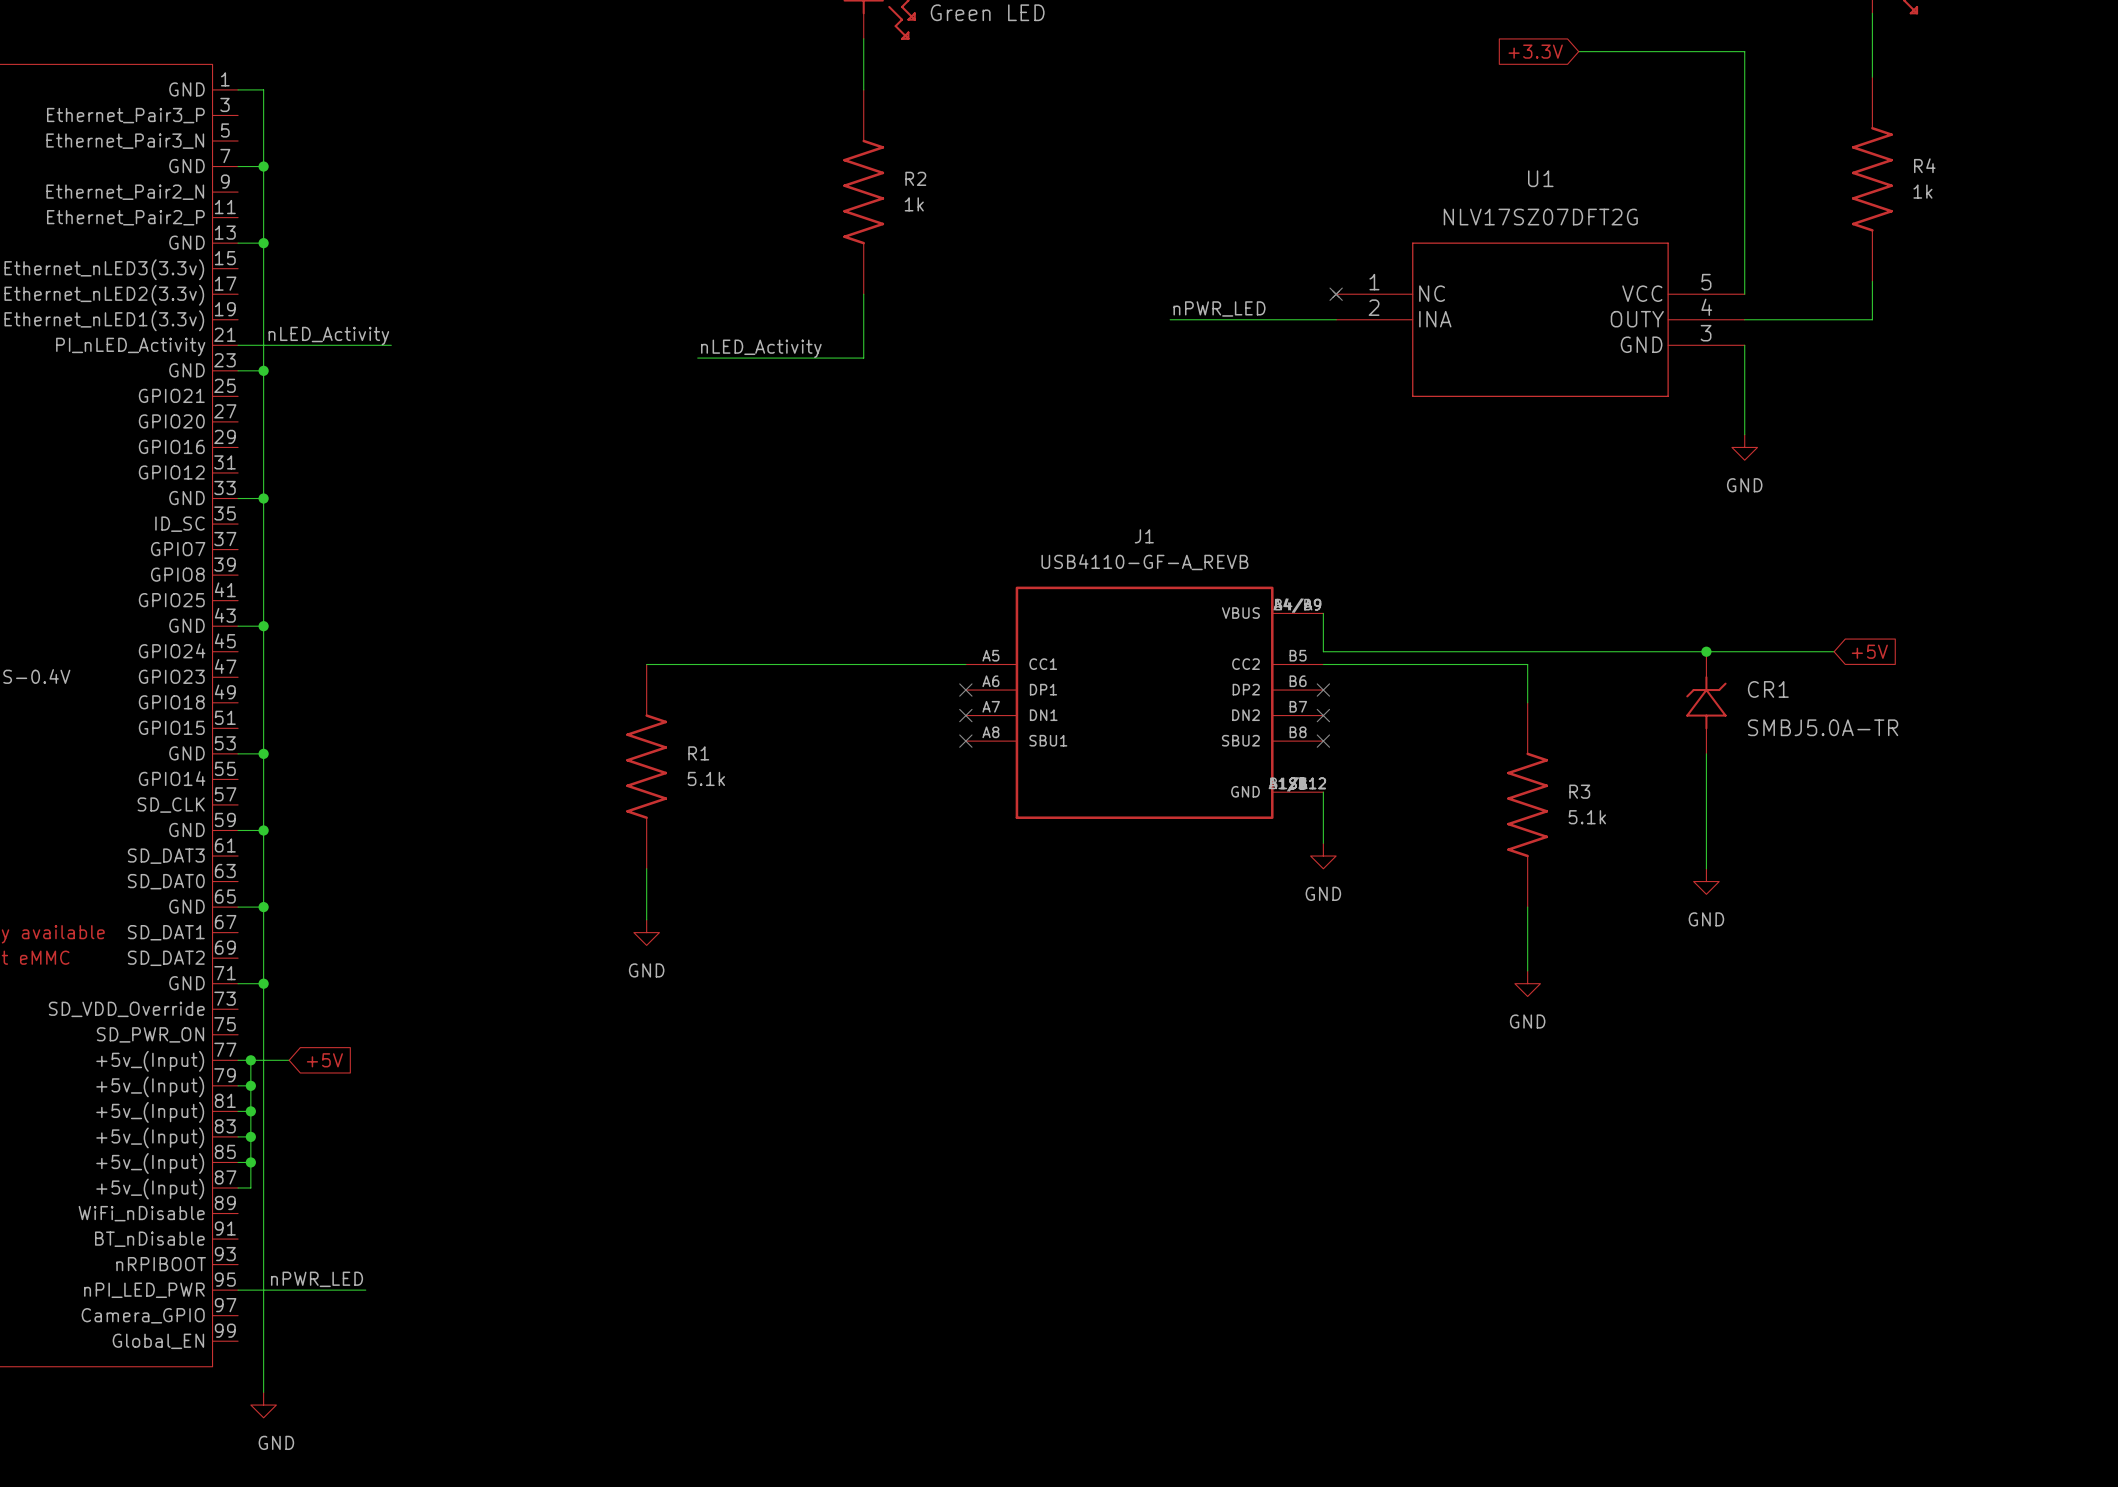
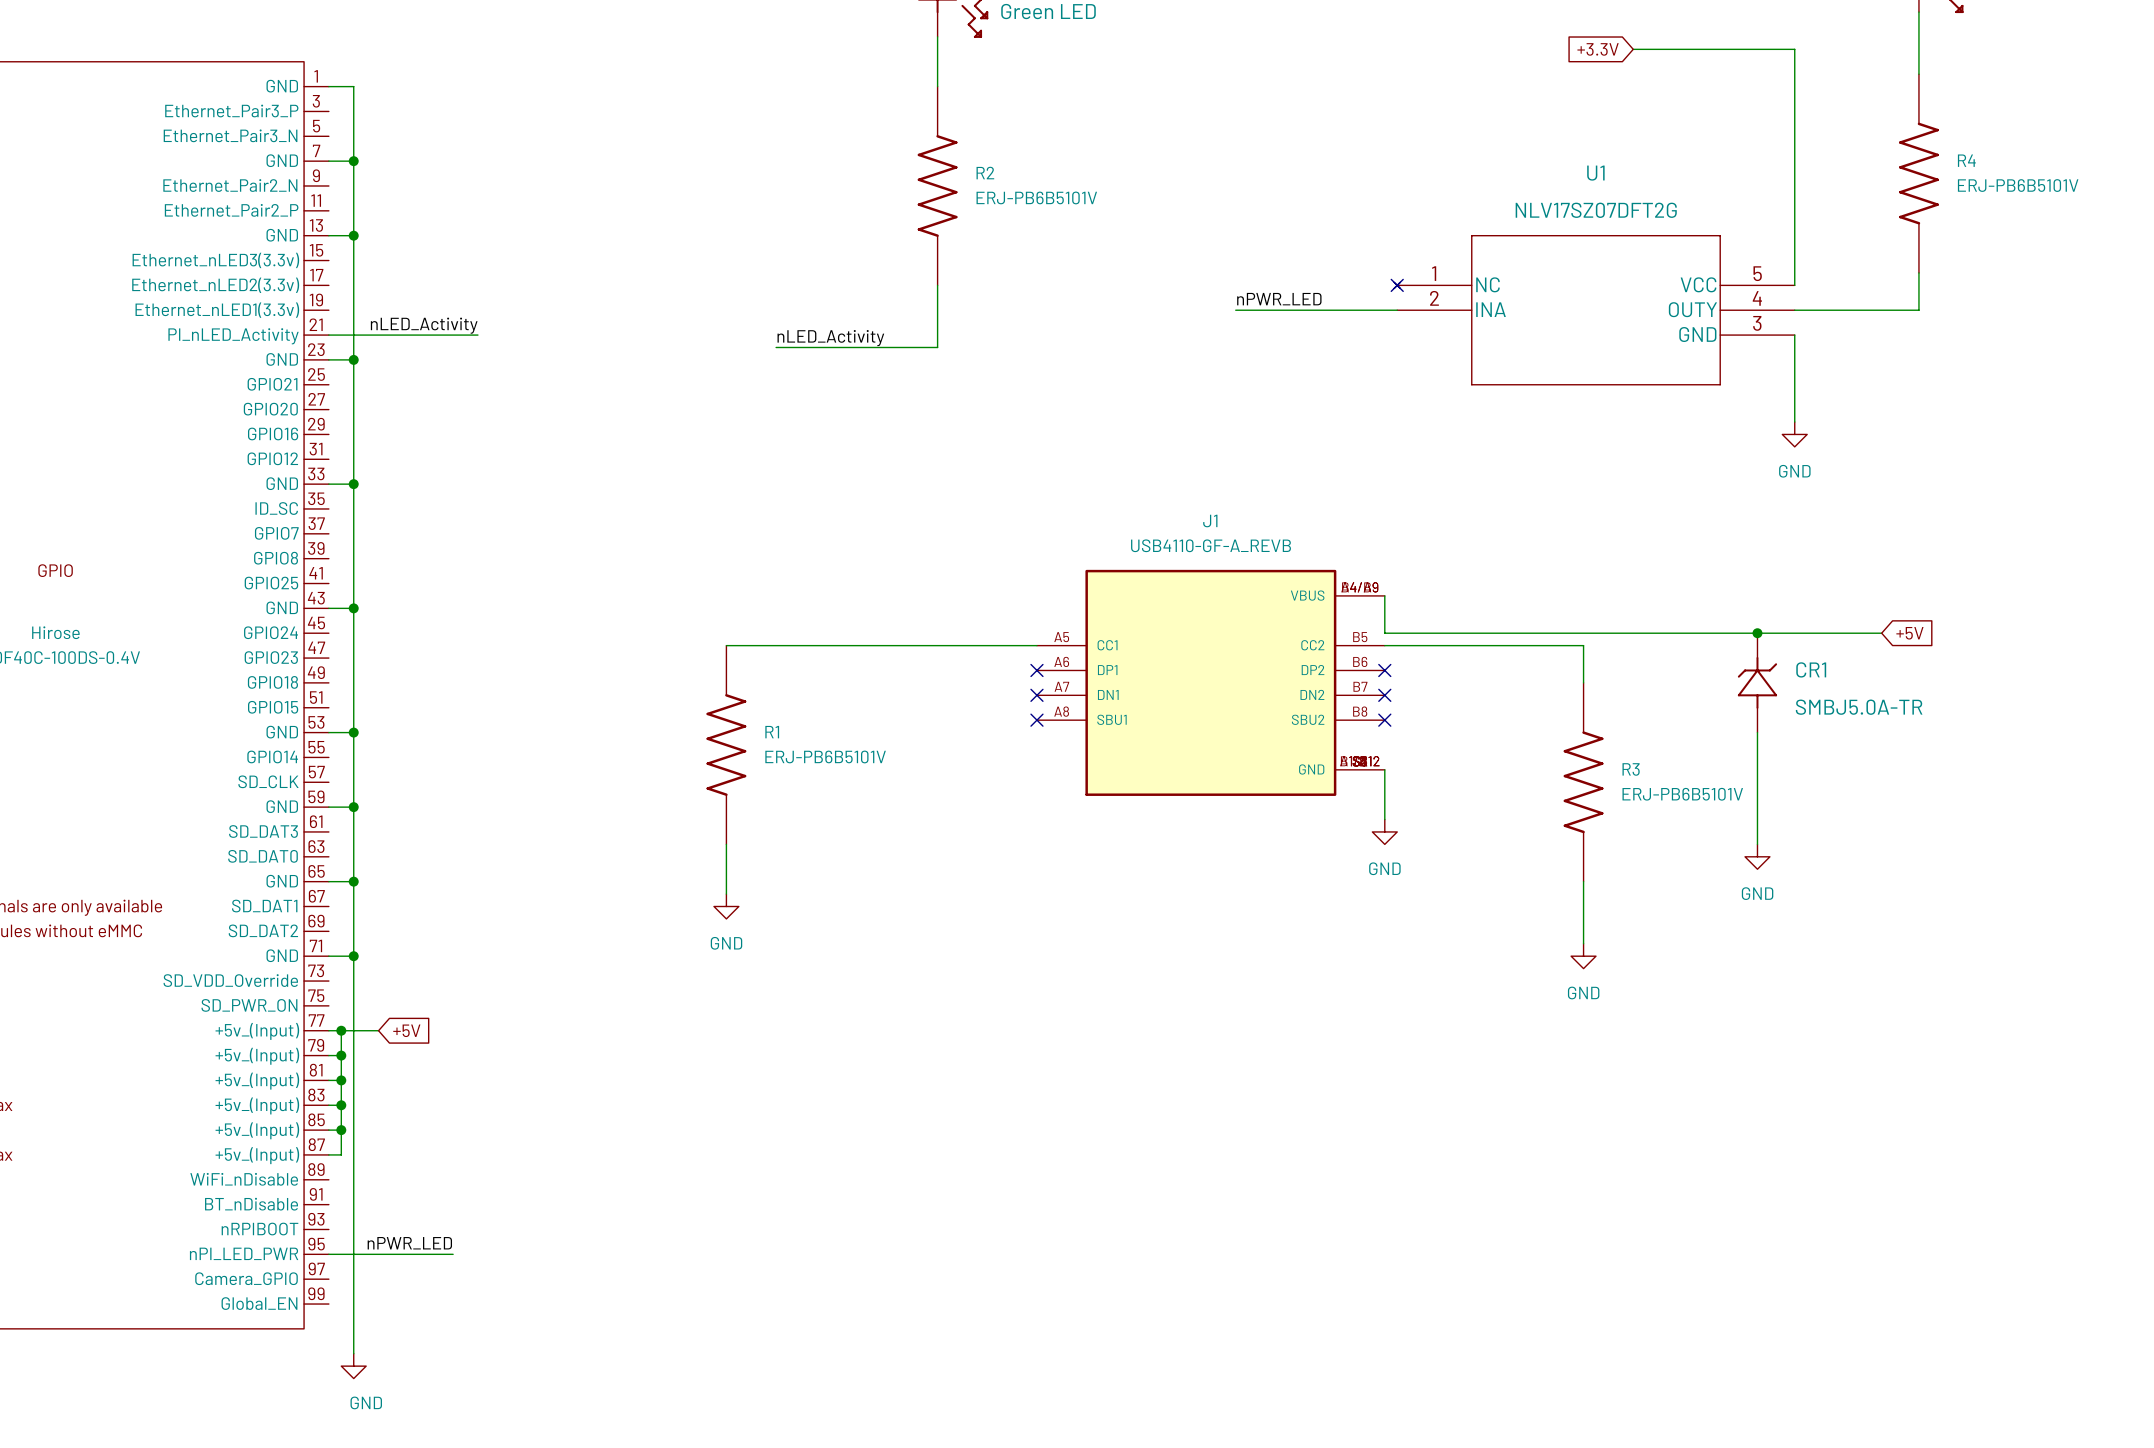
R4 value: 1k (1922, 191) -> ERJ-PB6B5101V (2018, 185)
R2 value: 1k (914, 204) -> ERJ-PB6B5101V (1036, 197)
R1 value: 5.1k (706, 778) -> ERJ-PB6B5101V (825, 756)
R3 value: 5.1k (1587, 817) -> ERJ-PB6B5101V (1682, 794)

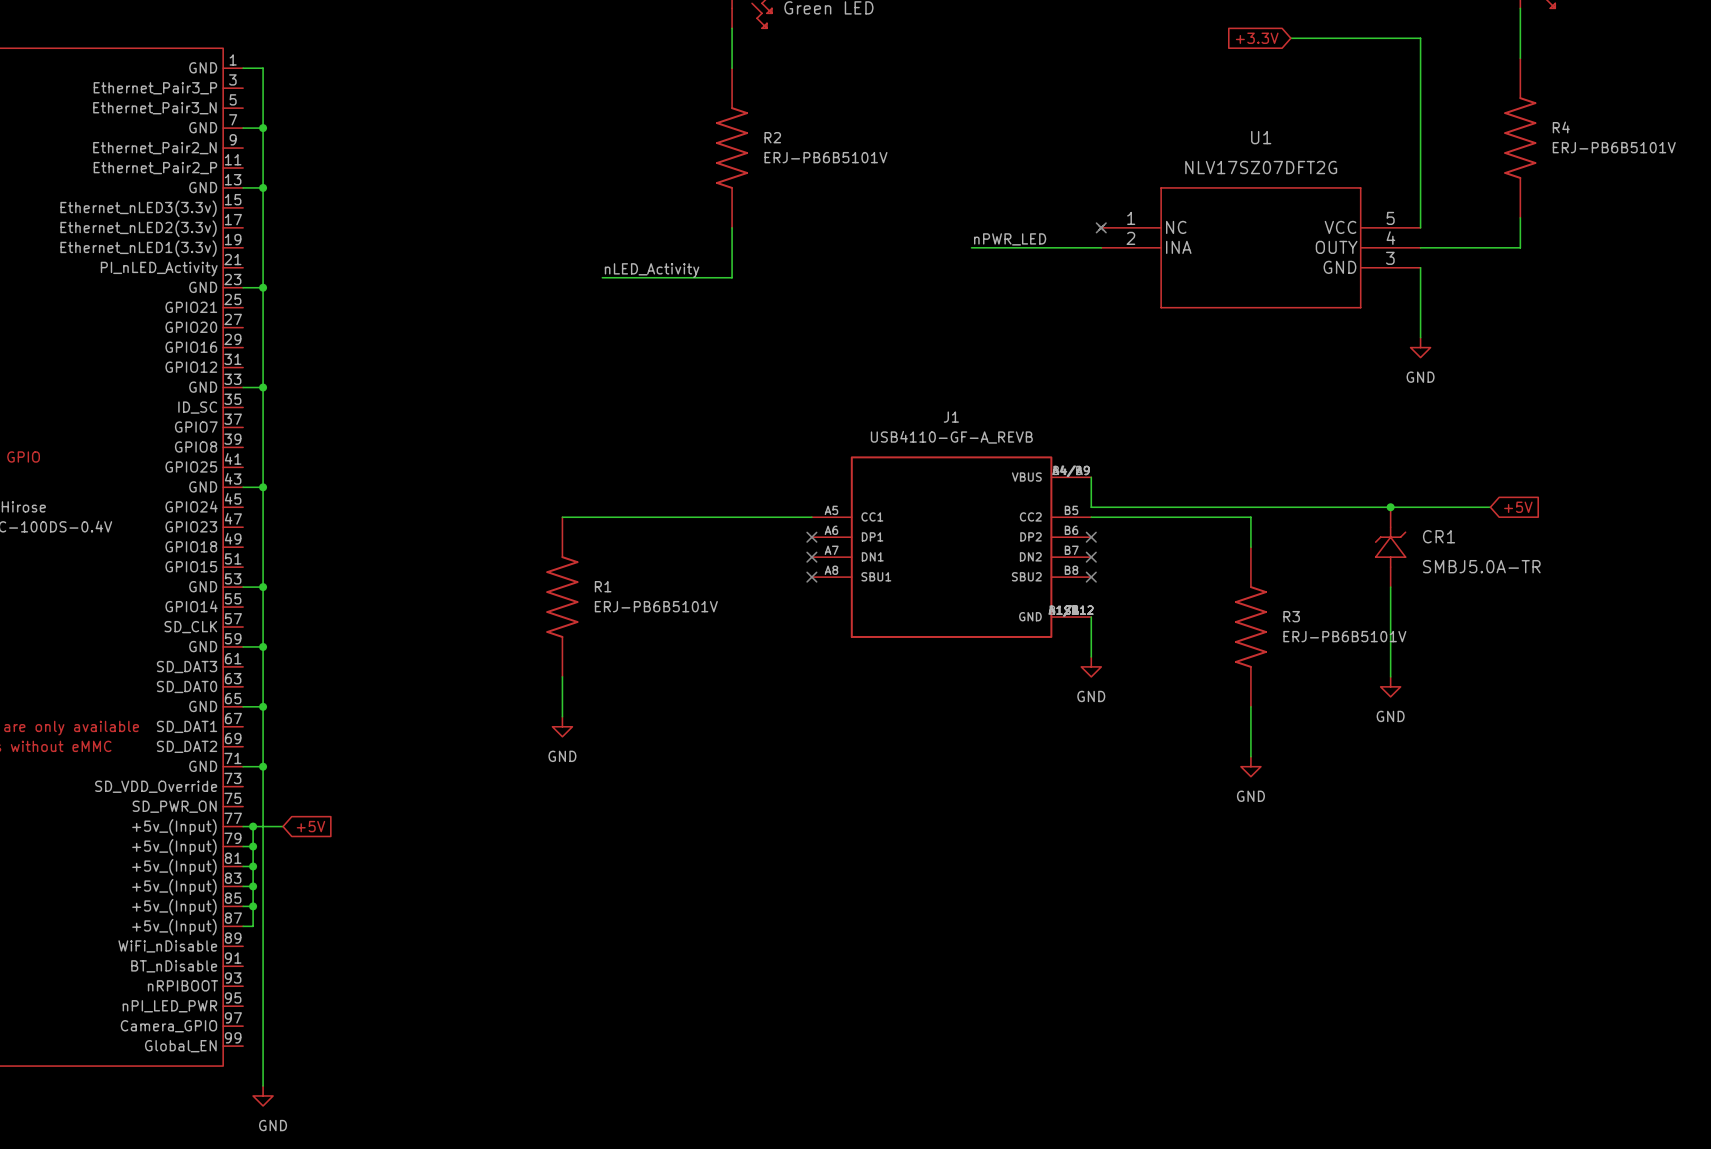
label: nLED_Activity (424, 325) -> none
wire: (328, 335) (477, 335) -> none
label: nPWR_LED (409, 1243) -> none
wire: (328, 1254) (453, 1254) -> none

